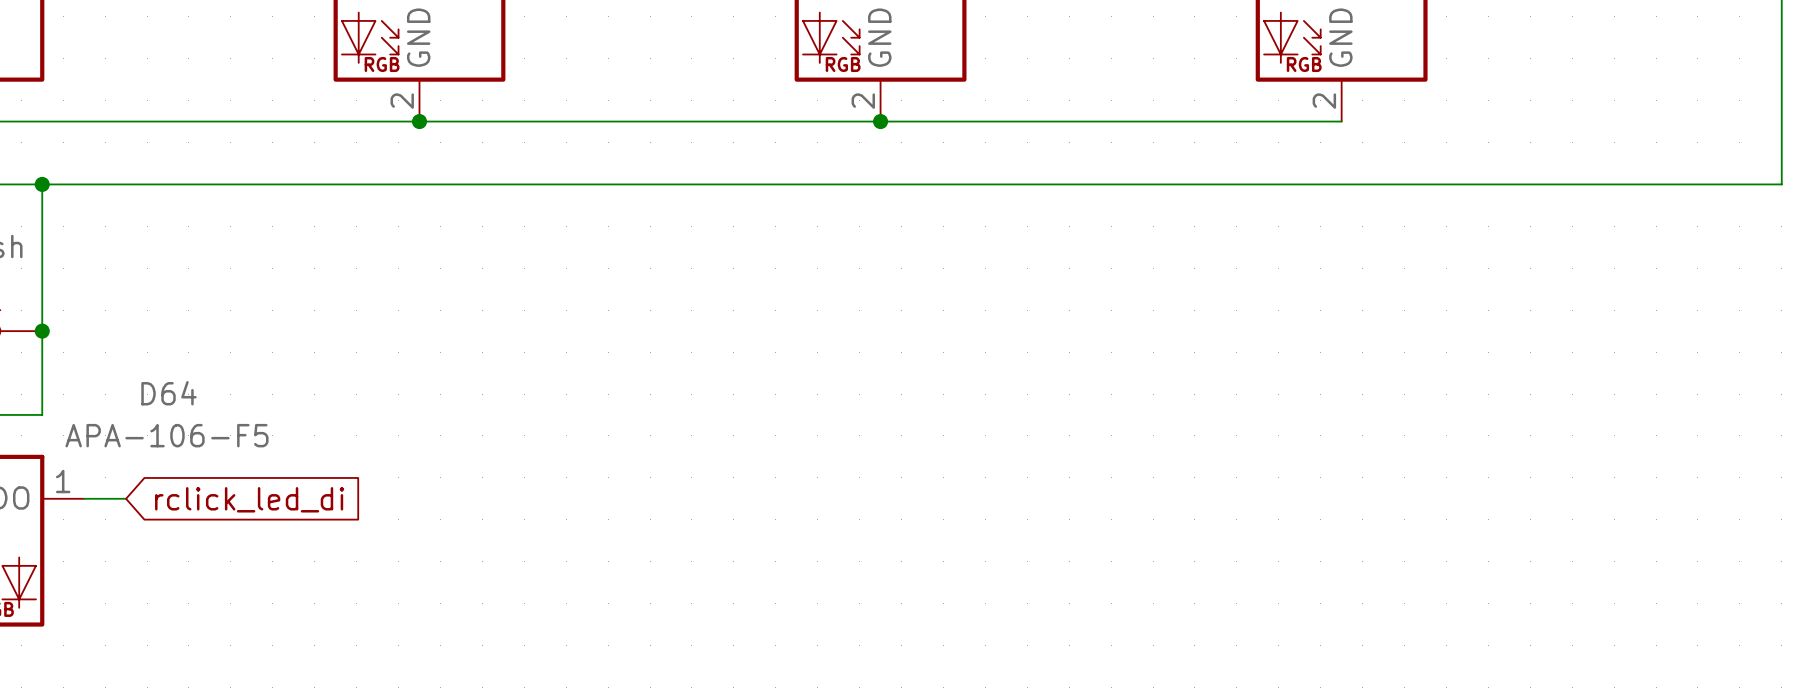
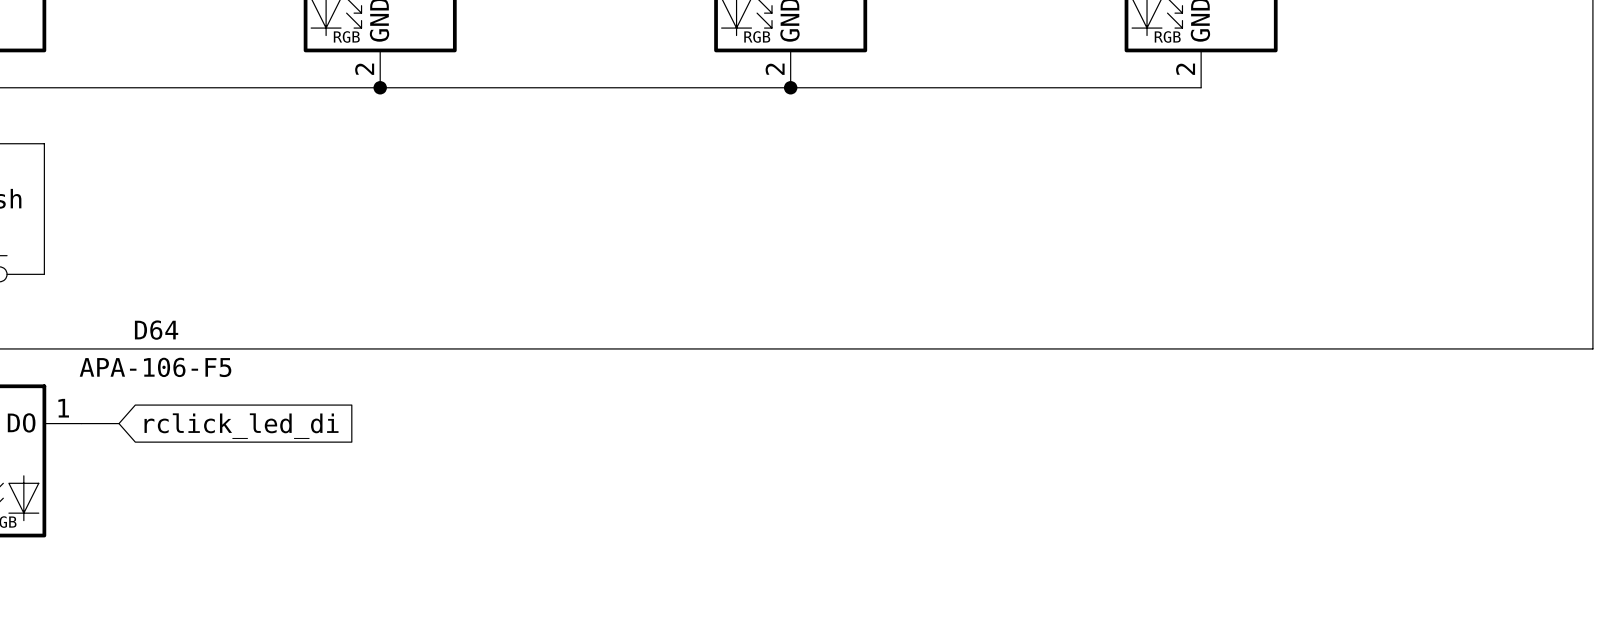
wire: (42, 184) (1781, 184) -> (44, 348) (1592, 348) (1592, 143)
junction: (42, 184) -> none
wire: (42, 331) (42, 414) -> none
junction: (42, 331) -> none

